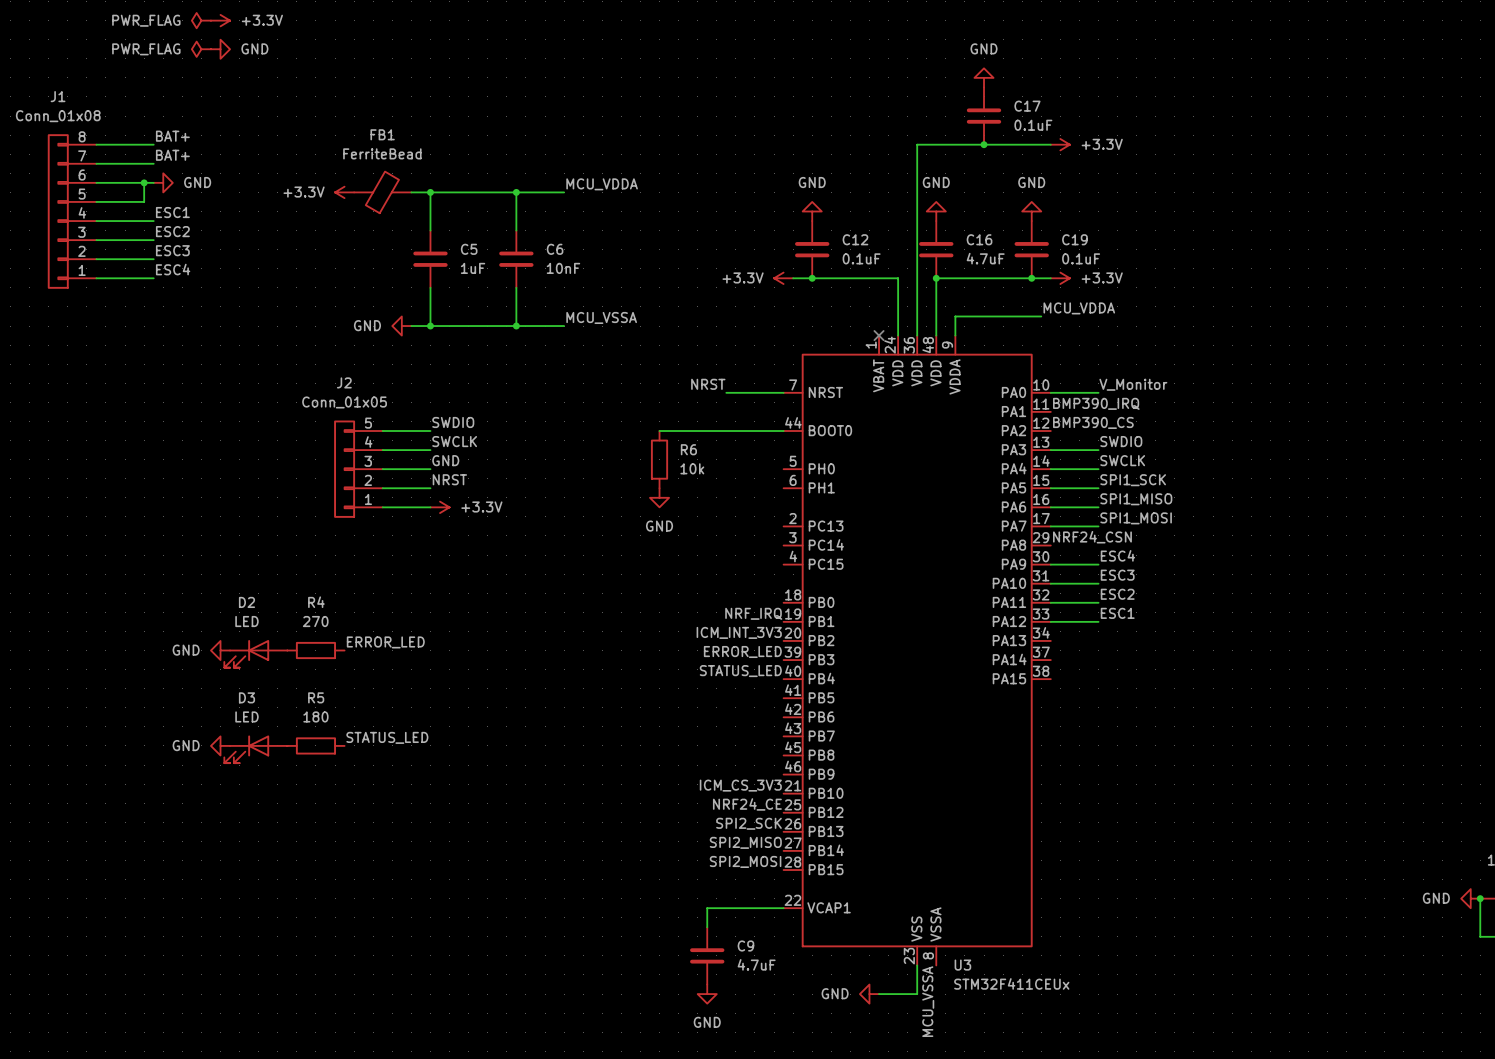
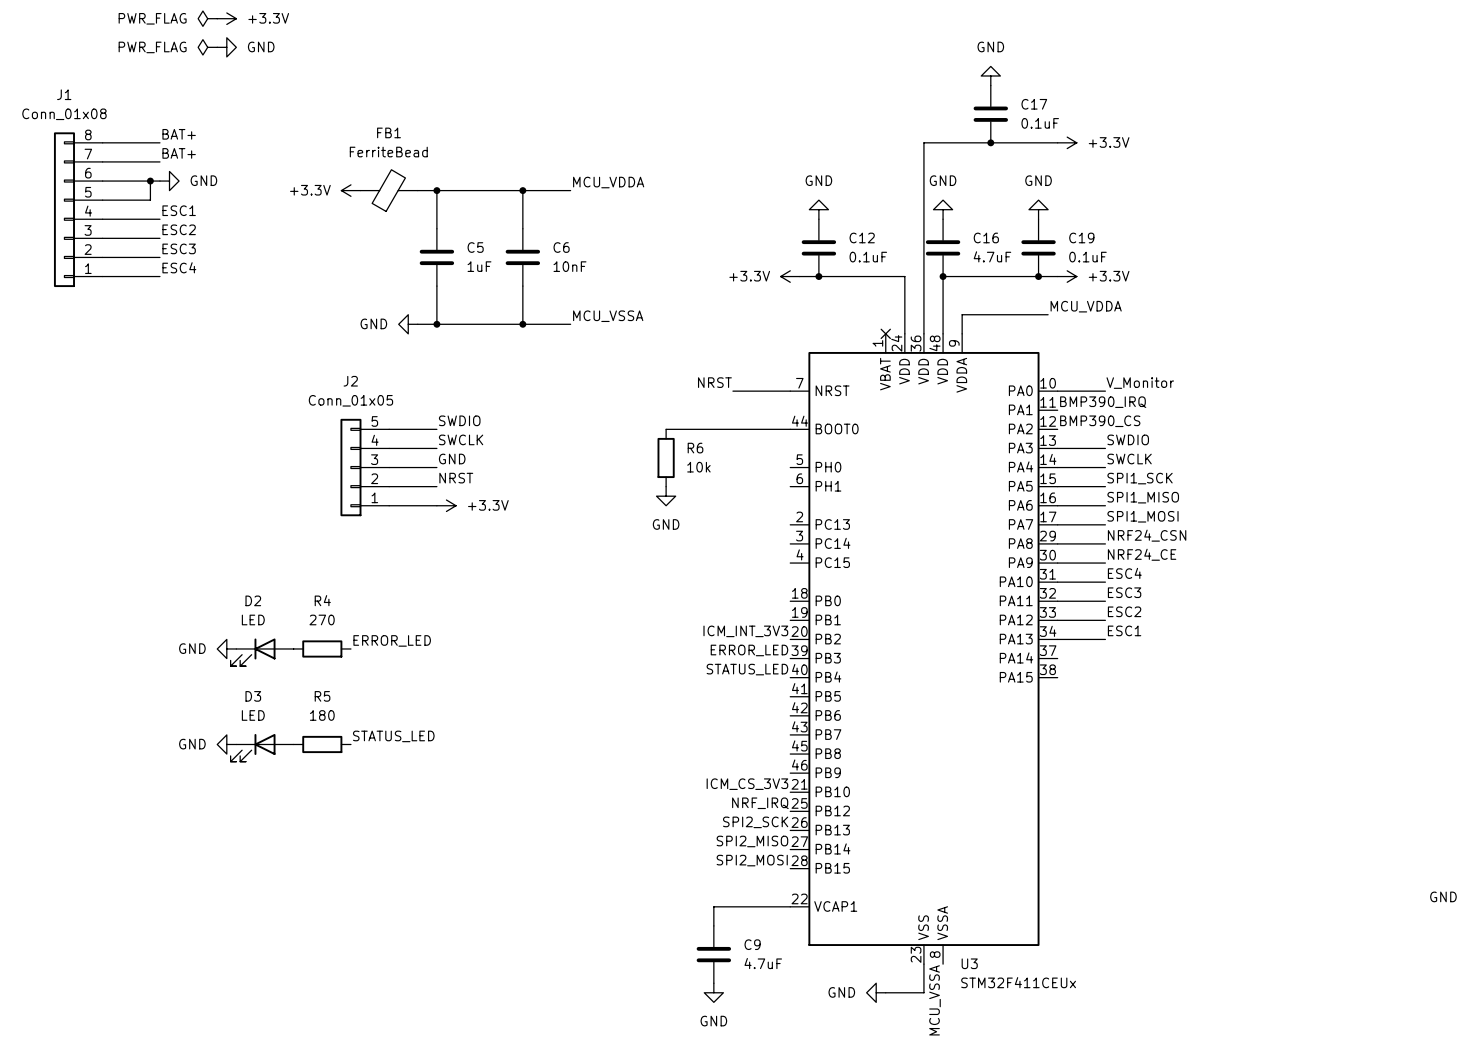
label position: NRF24_CSN (1092, 537) -> NRF24_CSN (1147, 535)
wire: none -> (1057, 543) (1105, 543)
label: ESC4 (1117, 555) -> NRF24_CE (1142, 554)
label: ESC3 (1117, 575) -> ESC4 (1124, 573)
label: ESC2 (1117, 594) -> ESC3 (1124, 592)
label: NRF_IRQ (753, 613) -> none
label: ESC1 (1117, 613) -> ESC2 (1124, 611)
label: none -> ESC1 (1124, 630)
wire: none -> (1057, 639) (1105, 639)
label: NRF24_CE (747, 804) -> NRF_IRQ (760, 803)

